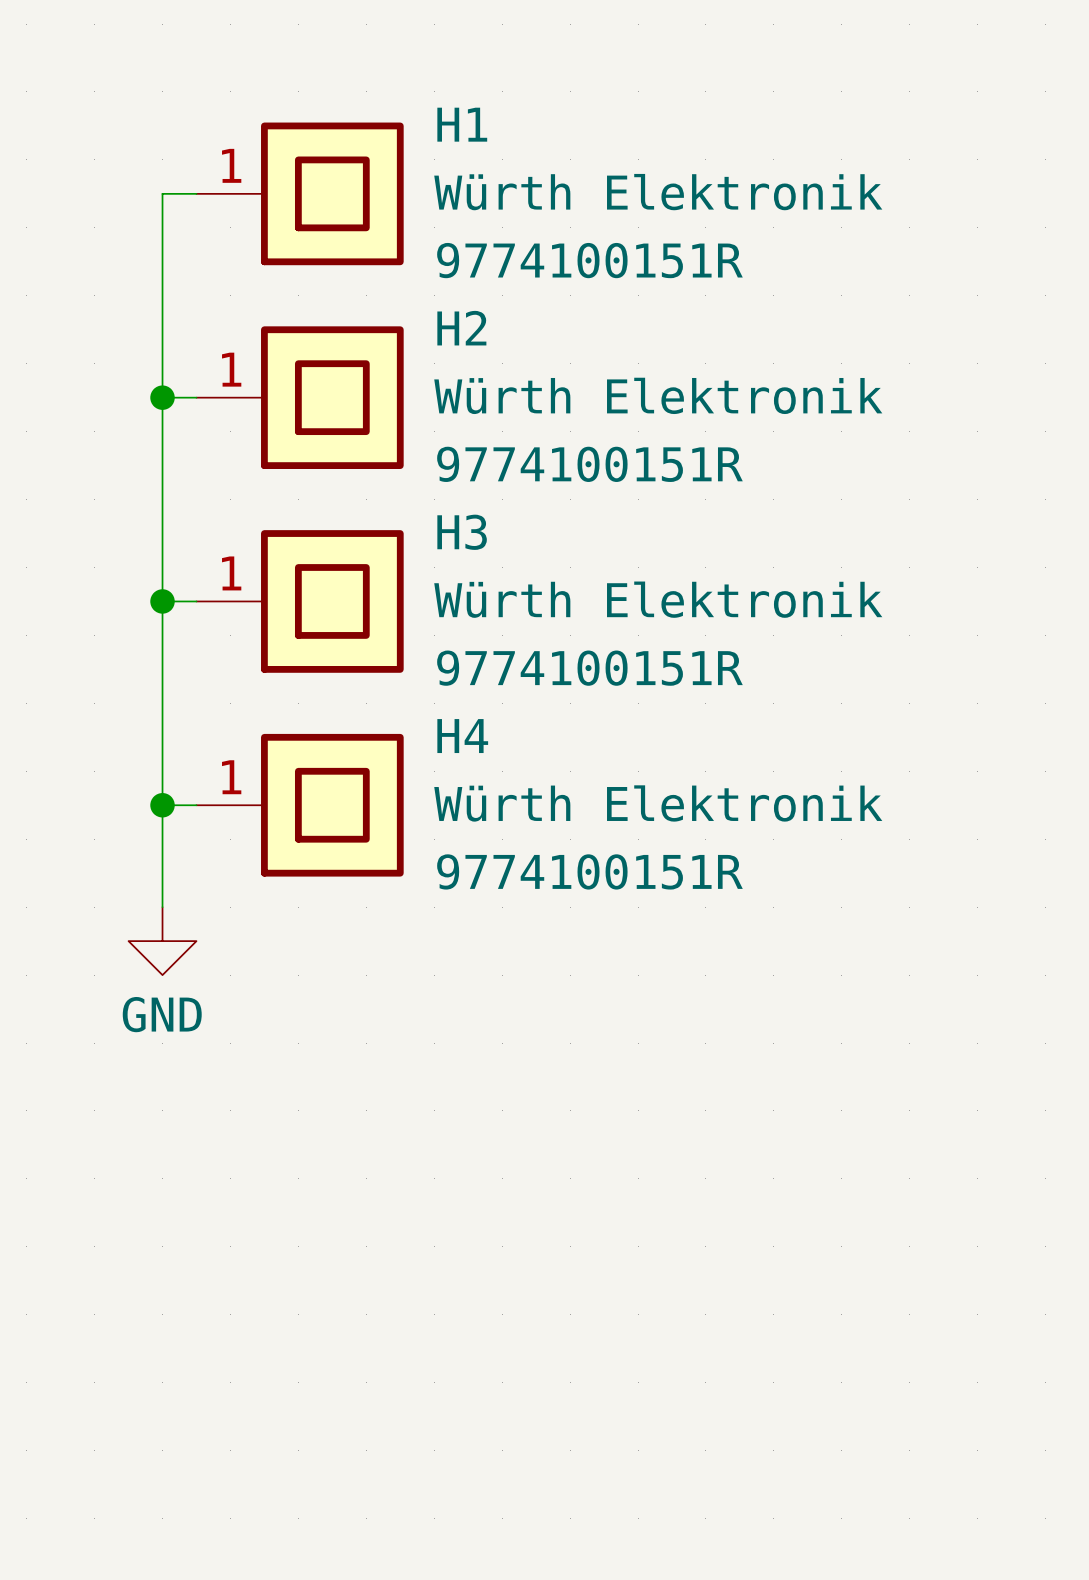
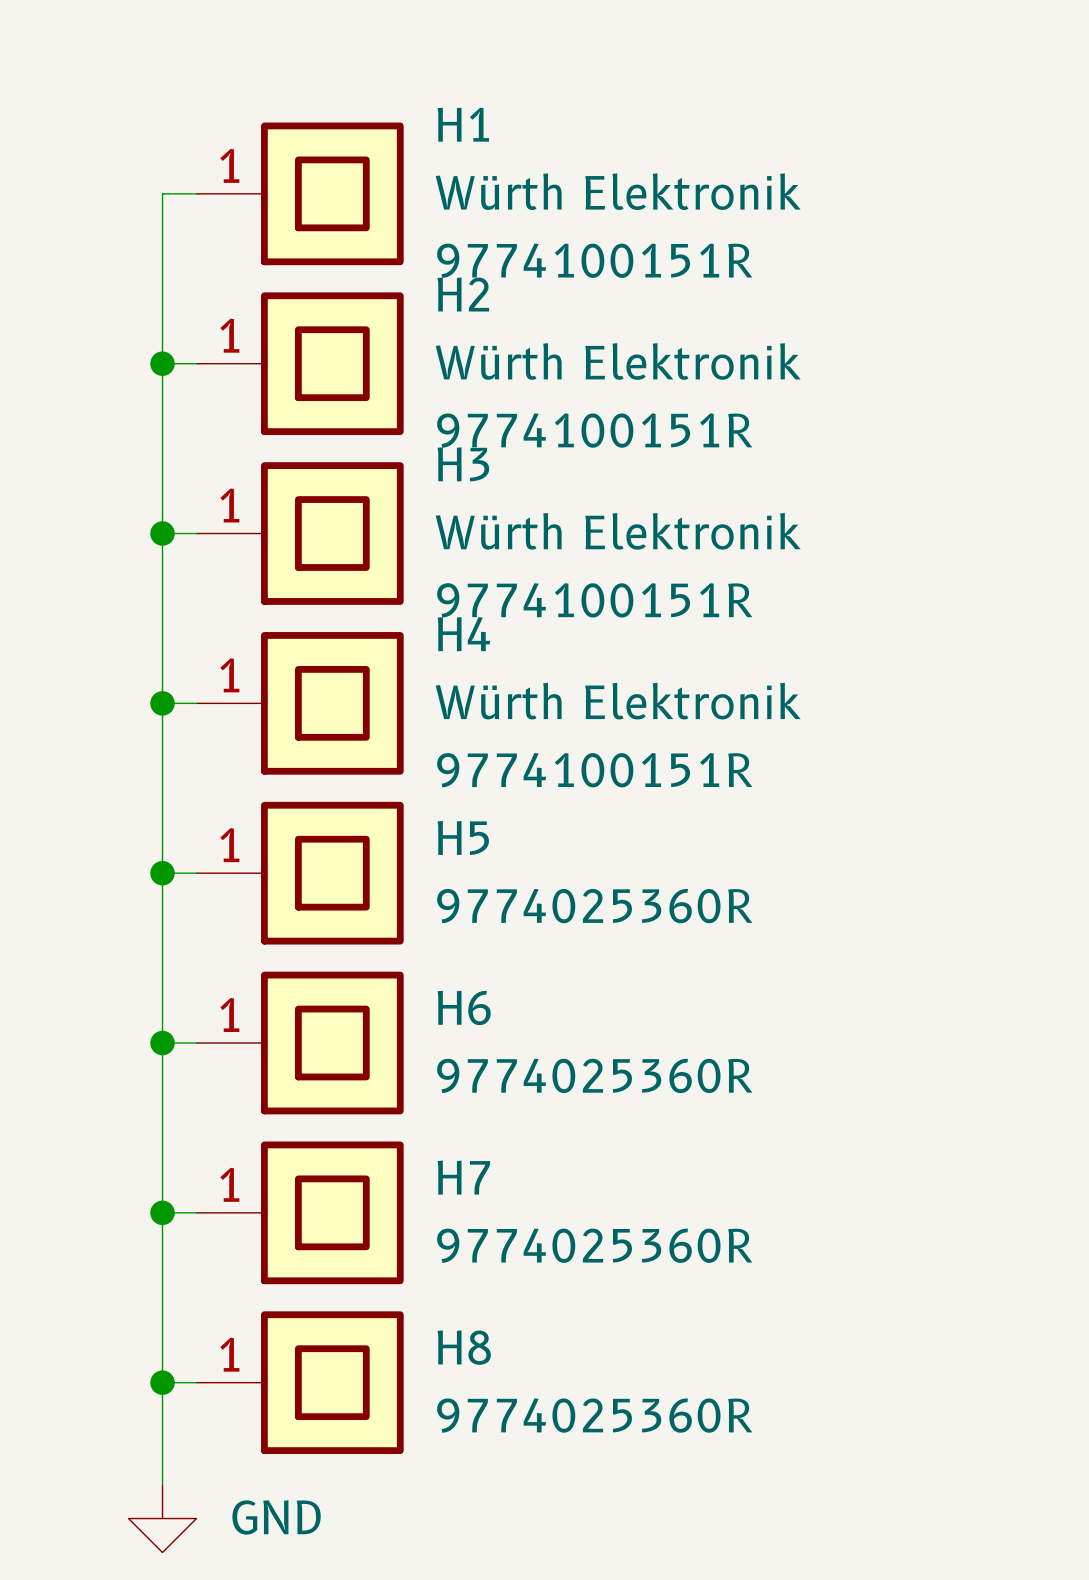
wire: (162, 397) (196, 397) -> (162, 363) (196, 363)
junction position: (162, 397) -> (162, 363)
H2 position: (300, 397) -> (300, 363)
junction: none -> (162, 533)
wire: (162, 601) (196, 601) -> (162, 533) (196, 533)
junction: (162, 601) -> none
H3 position: (300, 601) -> (300, 533)
wire: none -> (162, 703) (196, 703)
junction: none -> (162, 703)
wire: (162, 805) (196, 805) -> (162, 873) (196, 873)
junction: (162, 805) -> none
H4 position: (300, 805) -> (300, 703)
junction: none -> (162, 873)
H5: none -> (300, 873)
wire: none -> (162, 907) (162, 1484)
power symbol position: GND (162, 941) -> GND (162, 1518)
power symbol text position: GND (162, 1014) -> GND (276, 1517)
wire: none -> (162, 1043) (196, 1043)
junction: none -> (162, 1043)
H6: none -> (300, 1043)
wire: none -> (162, 1212) (196, 1212)
junction: none -> (162, 1212)
H7: none -> (300, 1212)
wire: none -> (162, 1382) (196, 1382)
junction: none -> (162, 1382)
H8: none -> (300, 1382)

